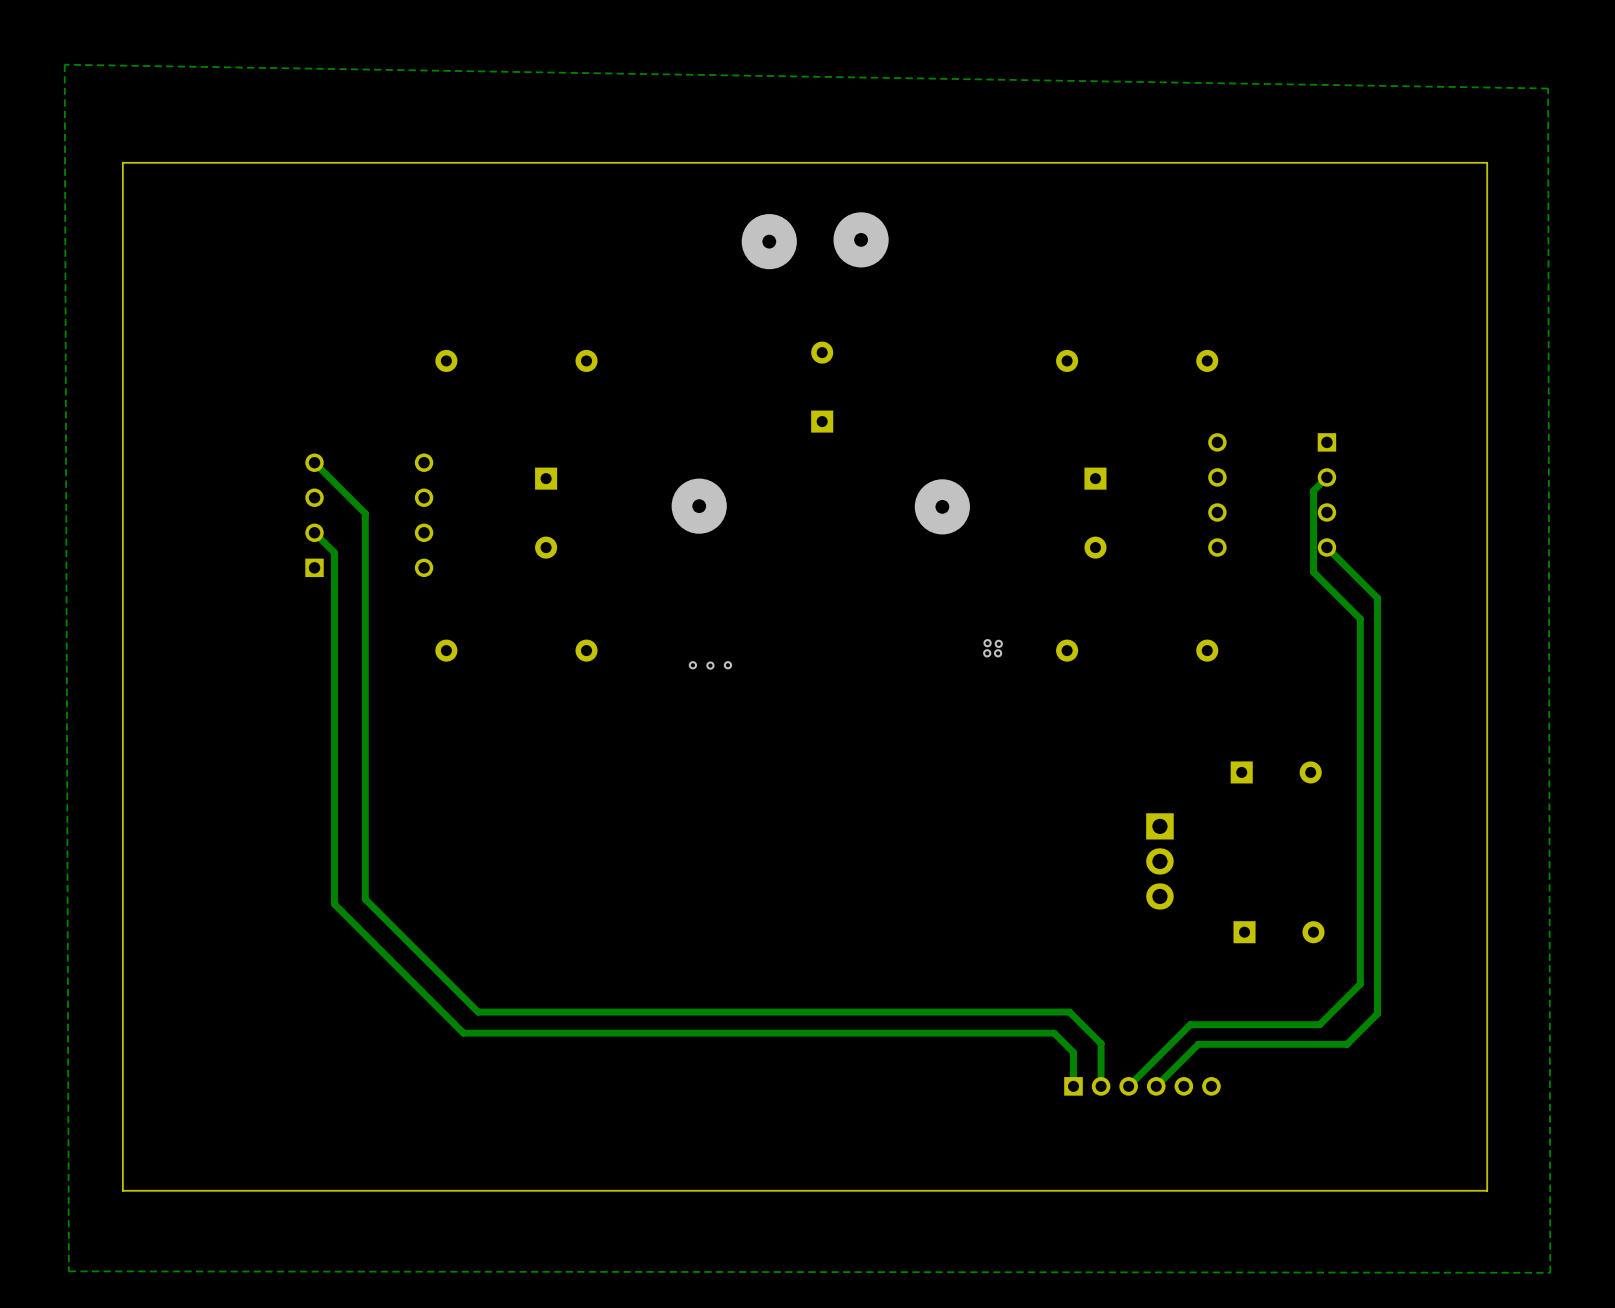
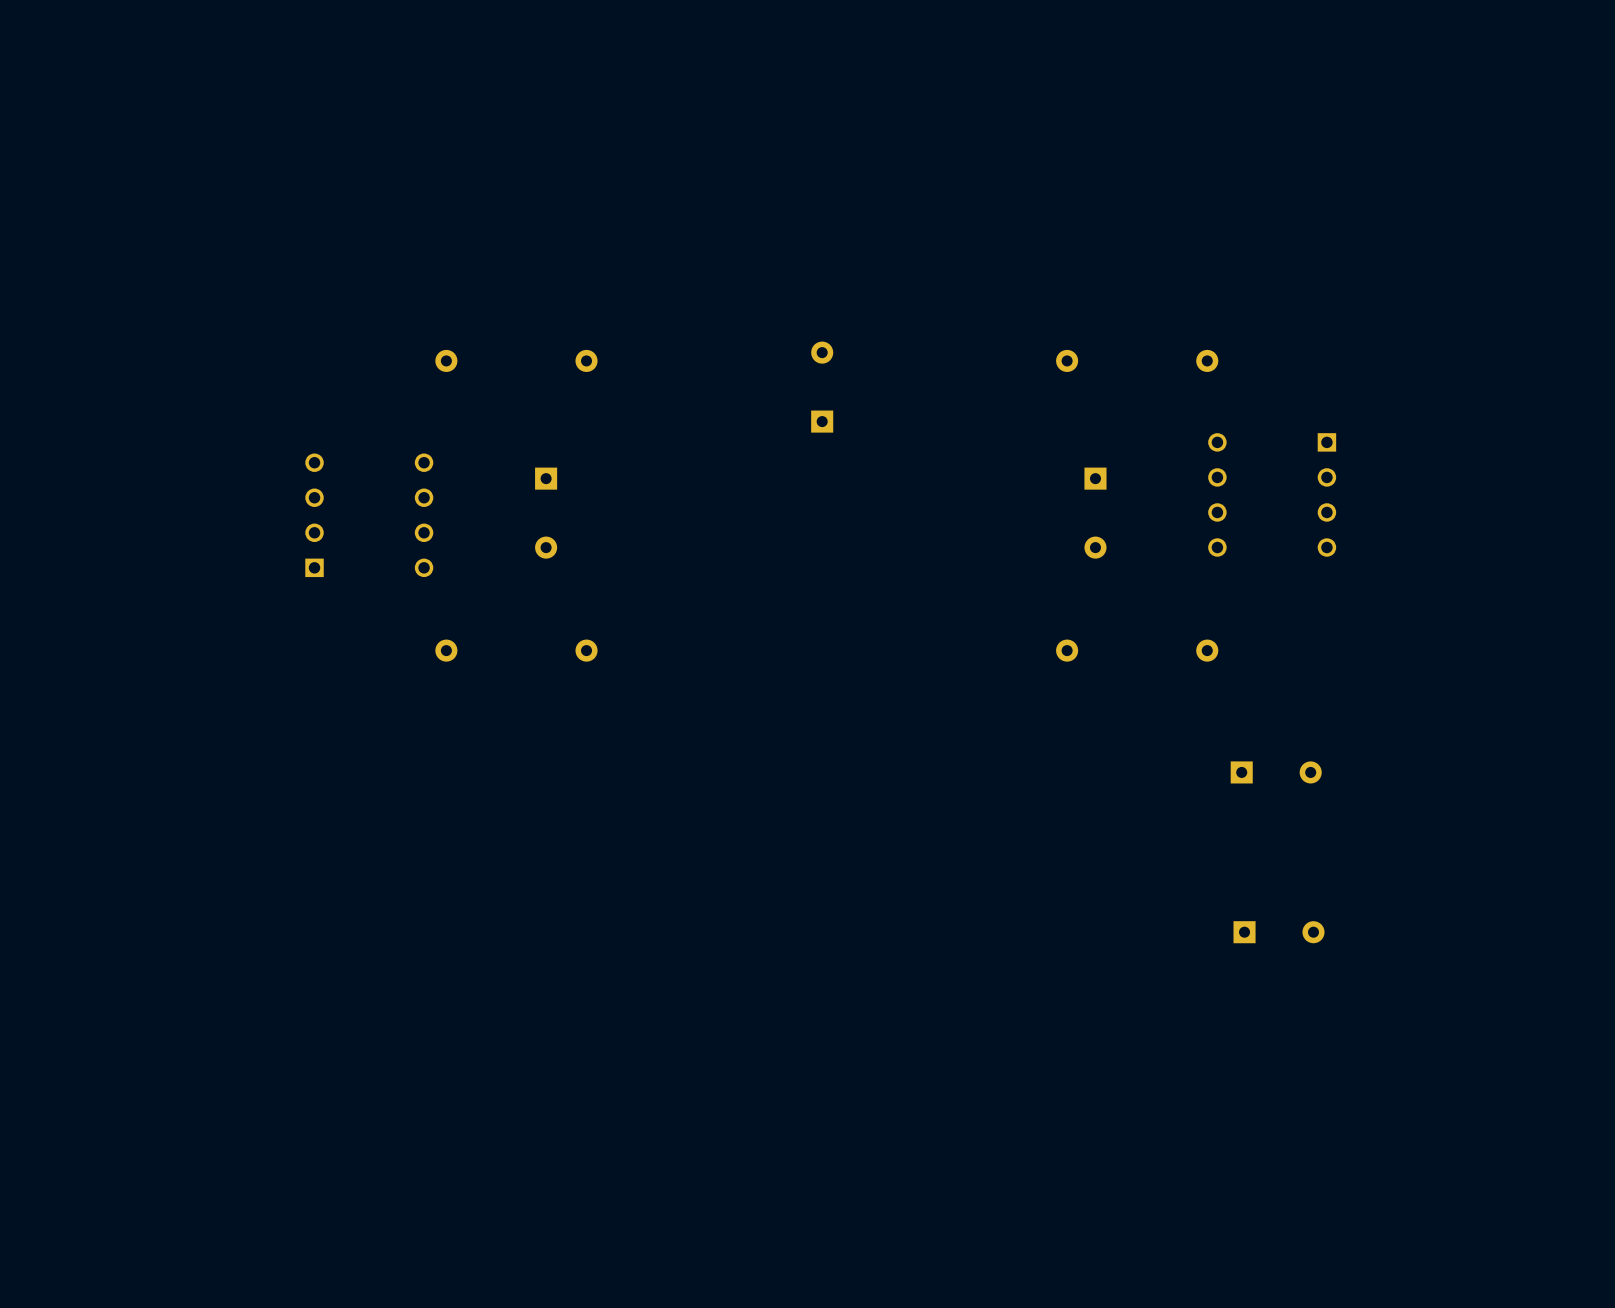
zone outline: (64, 64) (1548, 88) (1550, 1272) (68, 1271) (64, 64) -> none
board edge: (1487, 162) (122, 162) (122, 1190) (1487, 1190) (1487, 162) -> none
via: (861, 239) -> none
via: (769, 241) -> none
track: (314, 462) (365, 513) (365, 899) (478, 1012) (1069, 1012) (1101, 1043) (1101, 1086) -> none
track: (1326, 477) (1313, 490) (1313, 572) (1360, 618) (1360, 984) (1319, 1024) (1190, 1024) (1128, 1086) -> none
via: (699, 506) -> none
via: (942, 506) -> none
track: (314, 532) (334, 552) (334, 904) (463, 1033) (1054, 1033) (1073, 1052) (1073, 1086) -> none
track: (1326, 547) (1377, 598) (1377, 1013) (1347, 1044) (1198, 1044) (1156, 1086) -> none
via: (987, 643) -> none
via: (998, 643) -> none
via: (987, 653) -> none
via: (998, 653) -> none
via: (692, 665) -> none
via: (710, 665) -> none
via: (727, 665) -> none
part: (1159, 861) -> none
part: (1142, 1086) -> none

